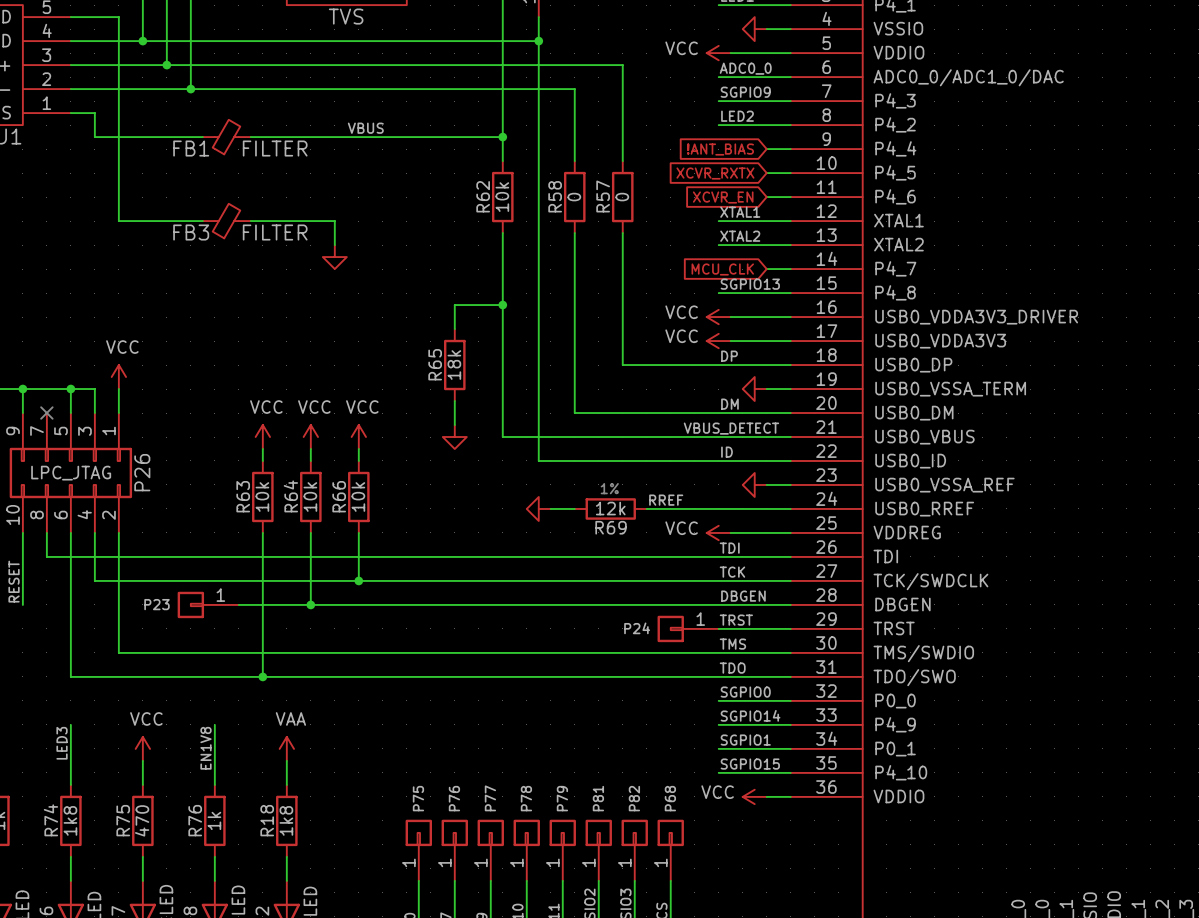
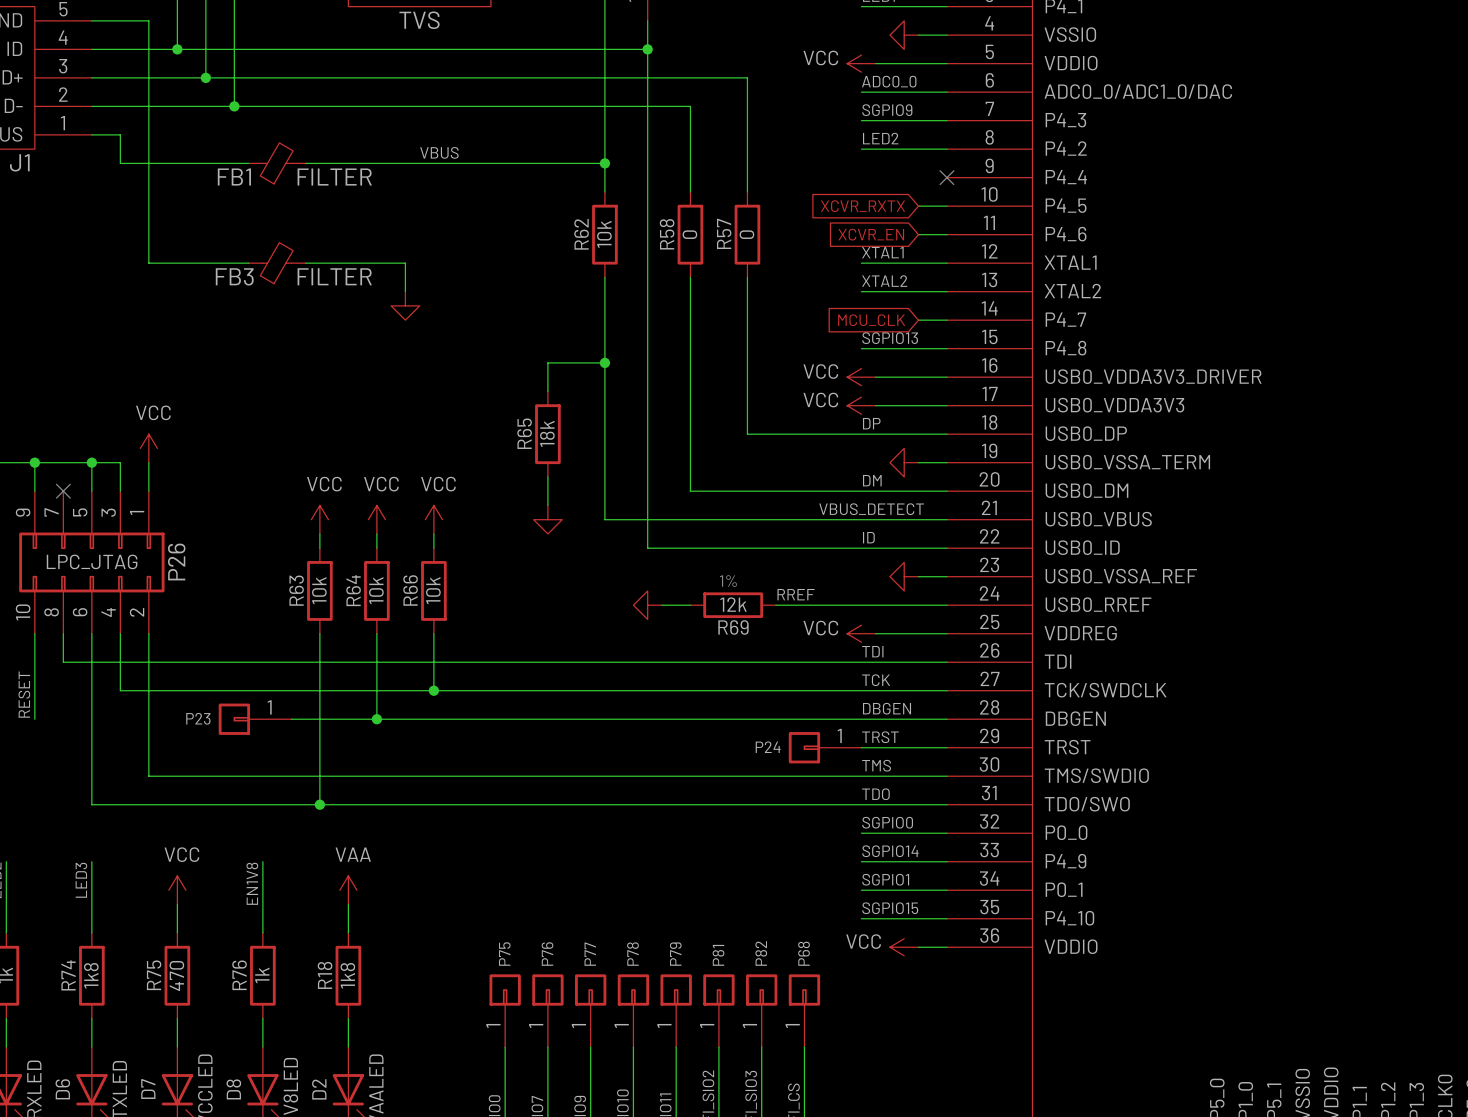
global label: !ANT_BIAS (720, 149) -> none
wire: (766, 149) (790, 149) -> none
no-connect mark: none -> (946, 177)

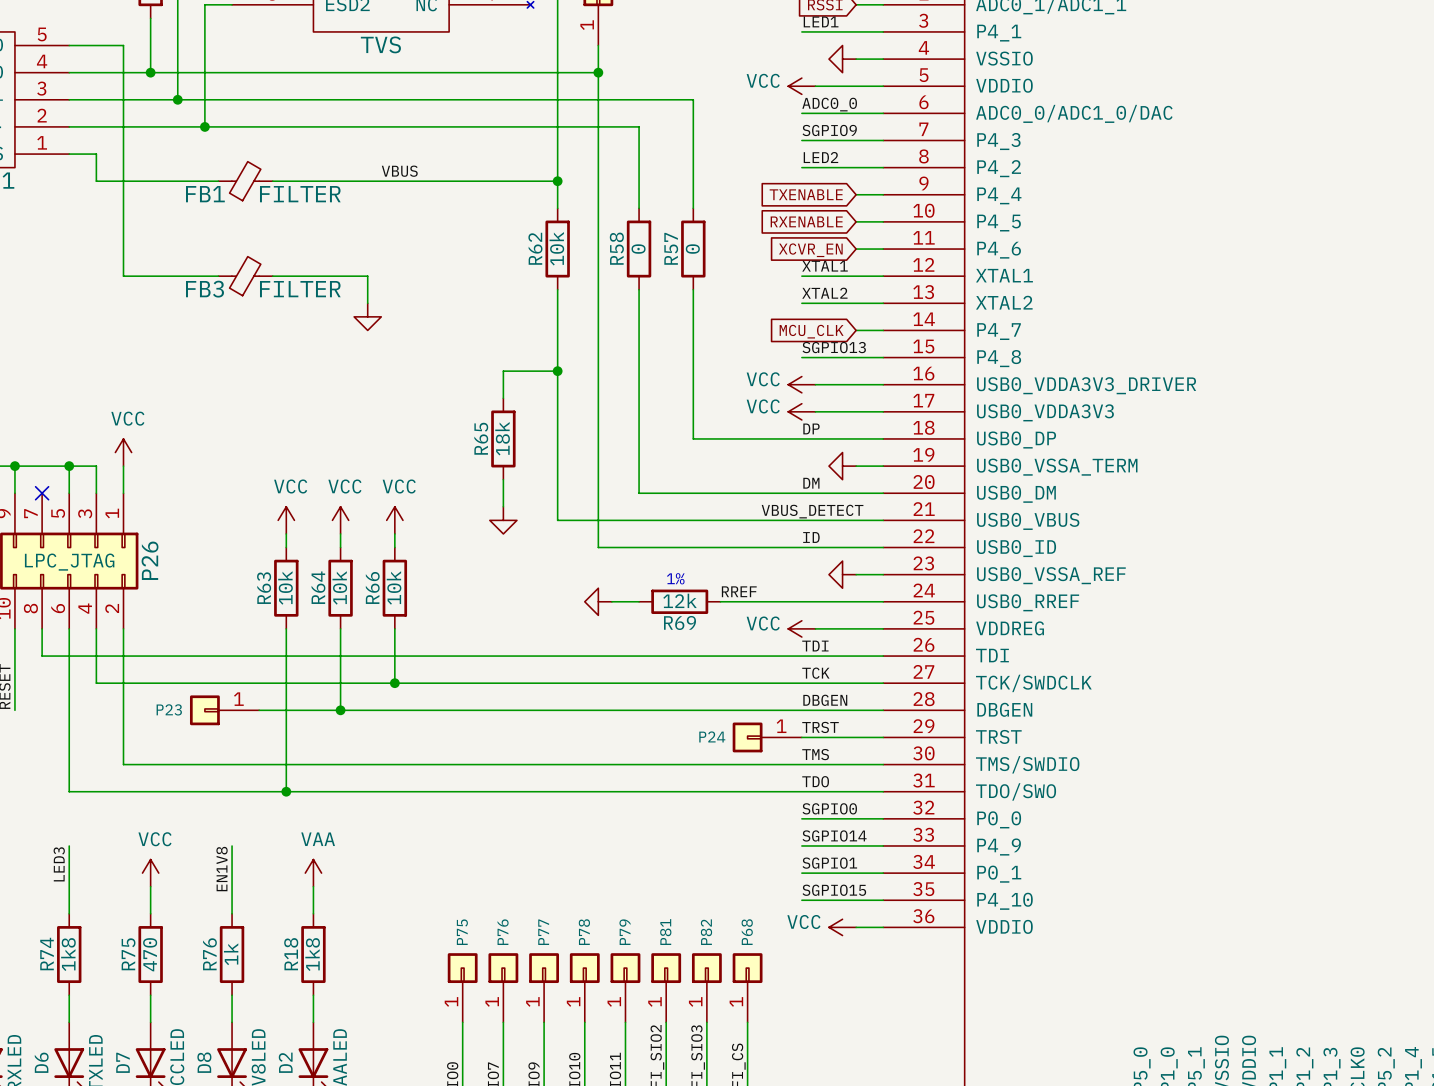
global label: none -> TXENABLE (806, 194)
wire: none -> (856, 194) (883, 194)
no-connect mark: (946, 177) -> none
global label: XCVR_RXTX (862, 206) -> RXENABLE (806, 221)

